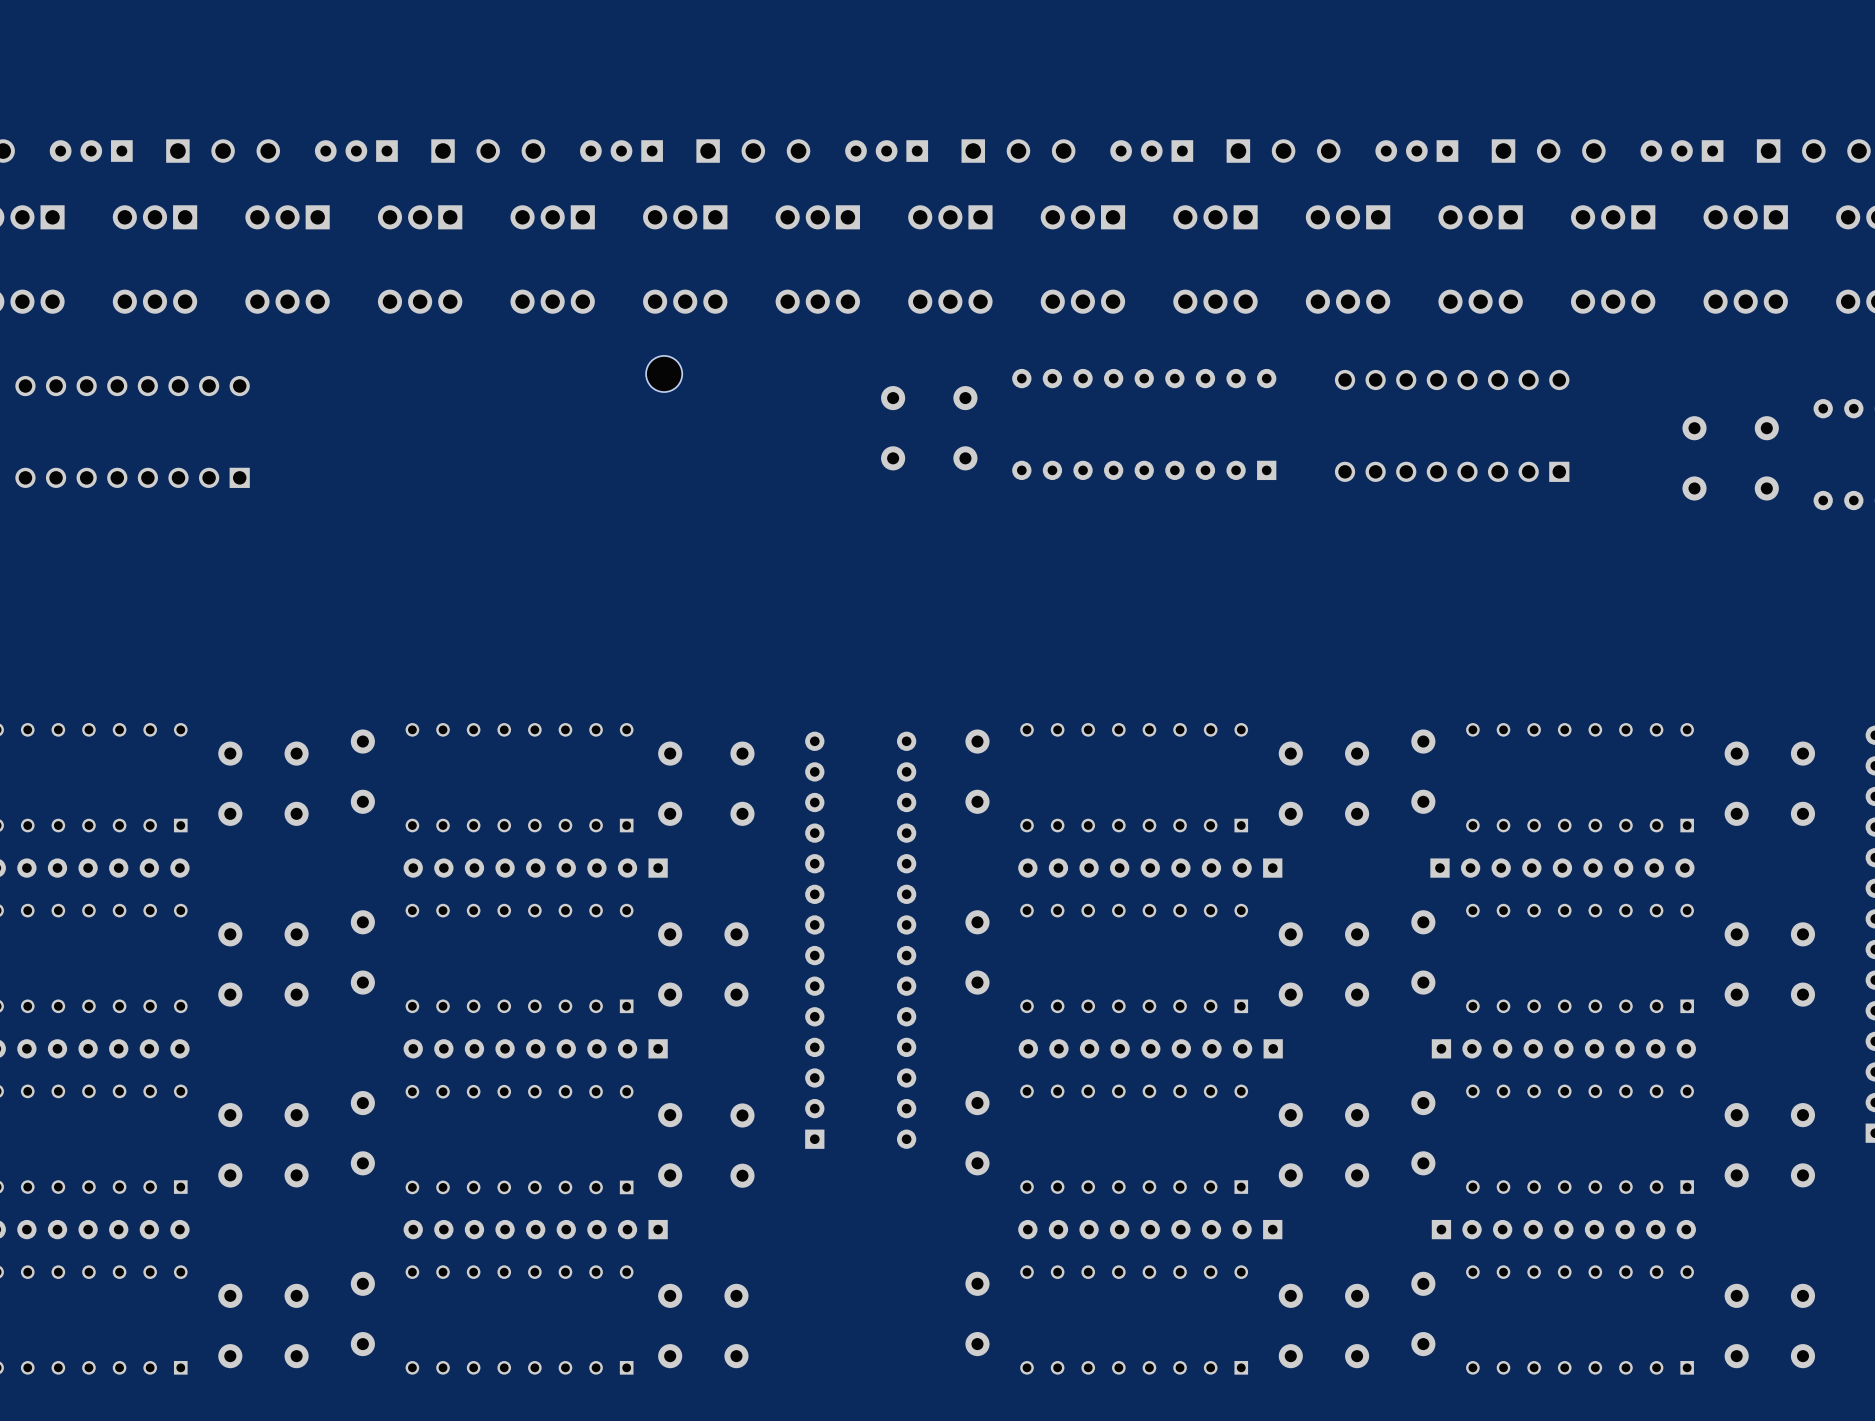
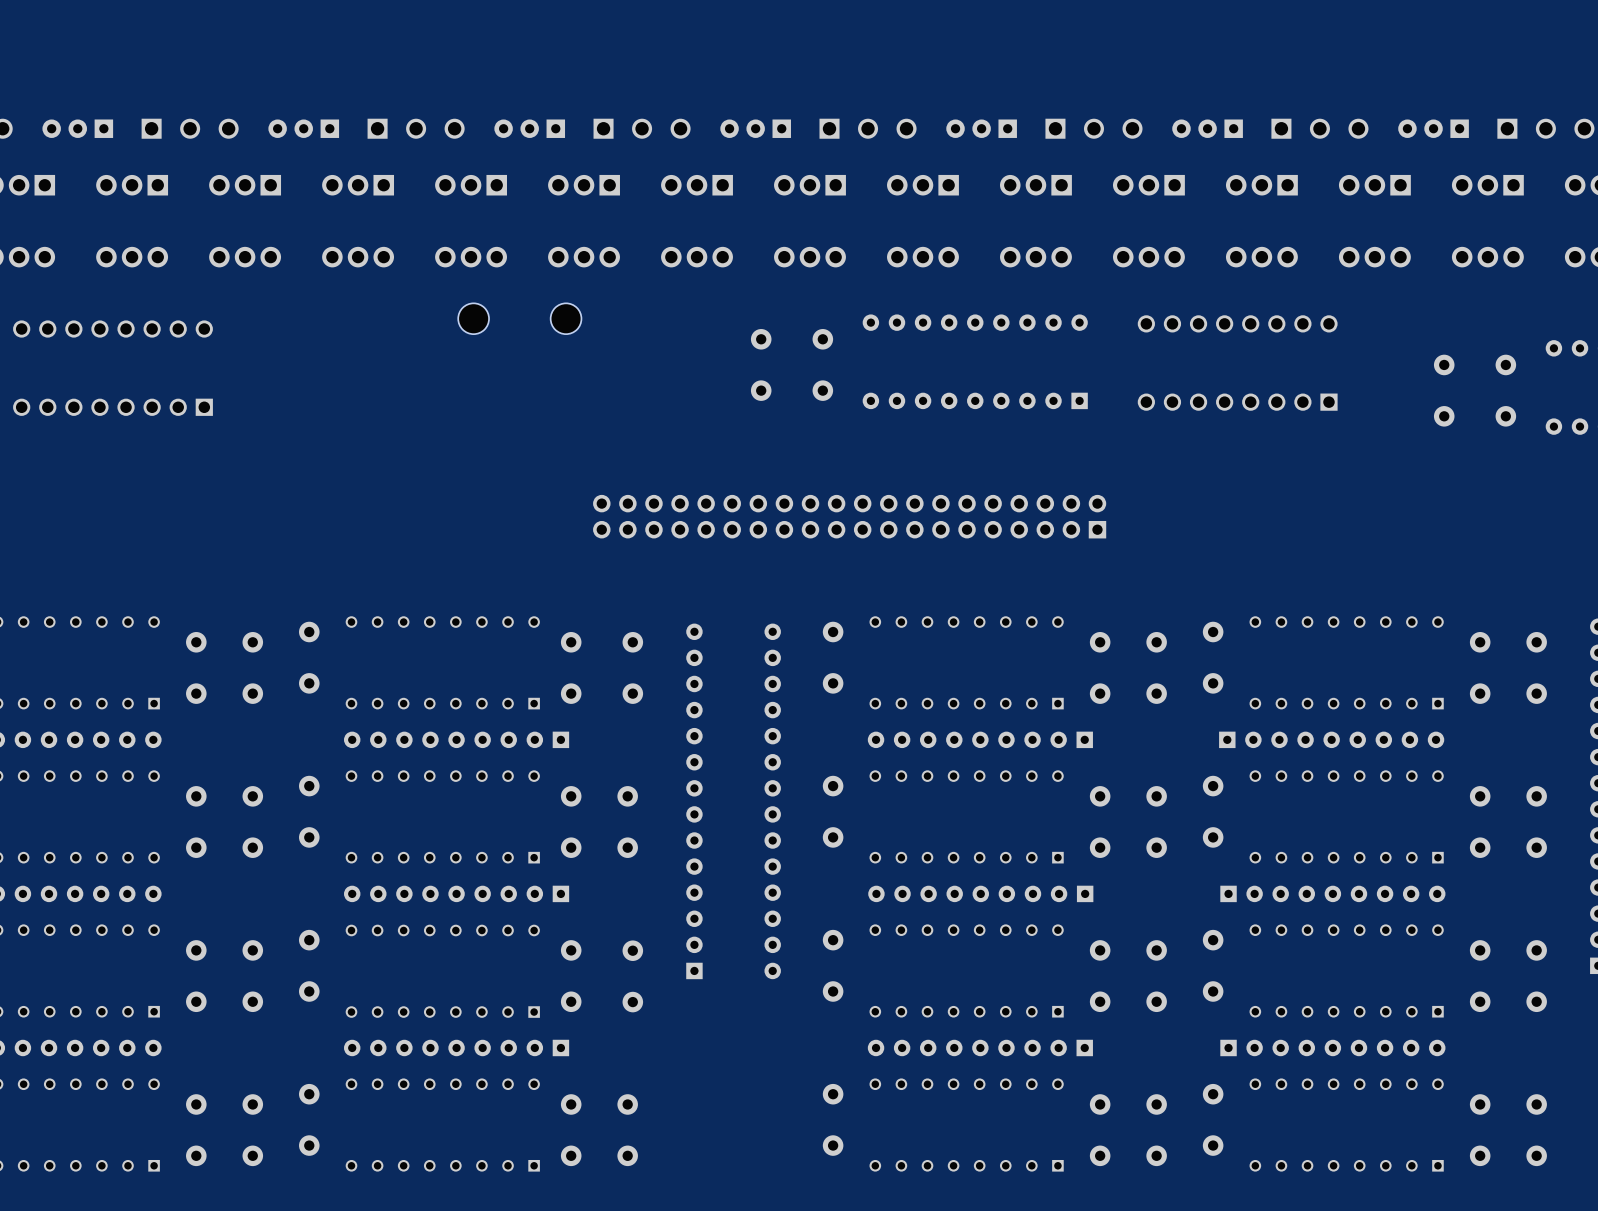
part: none -> (473, 318)
part: none -> (849, 516)

